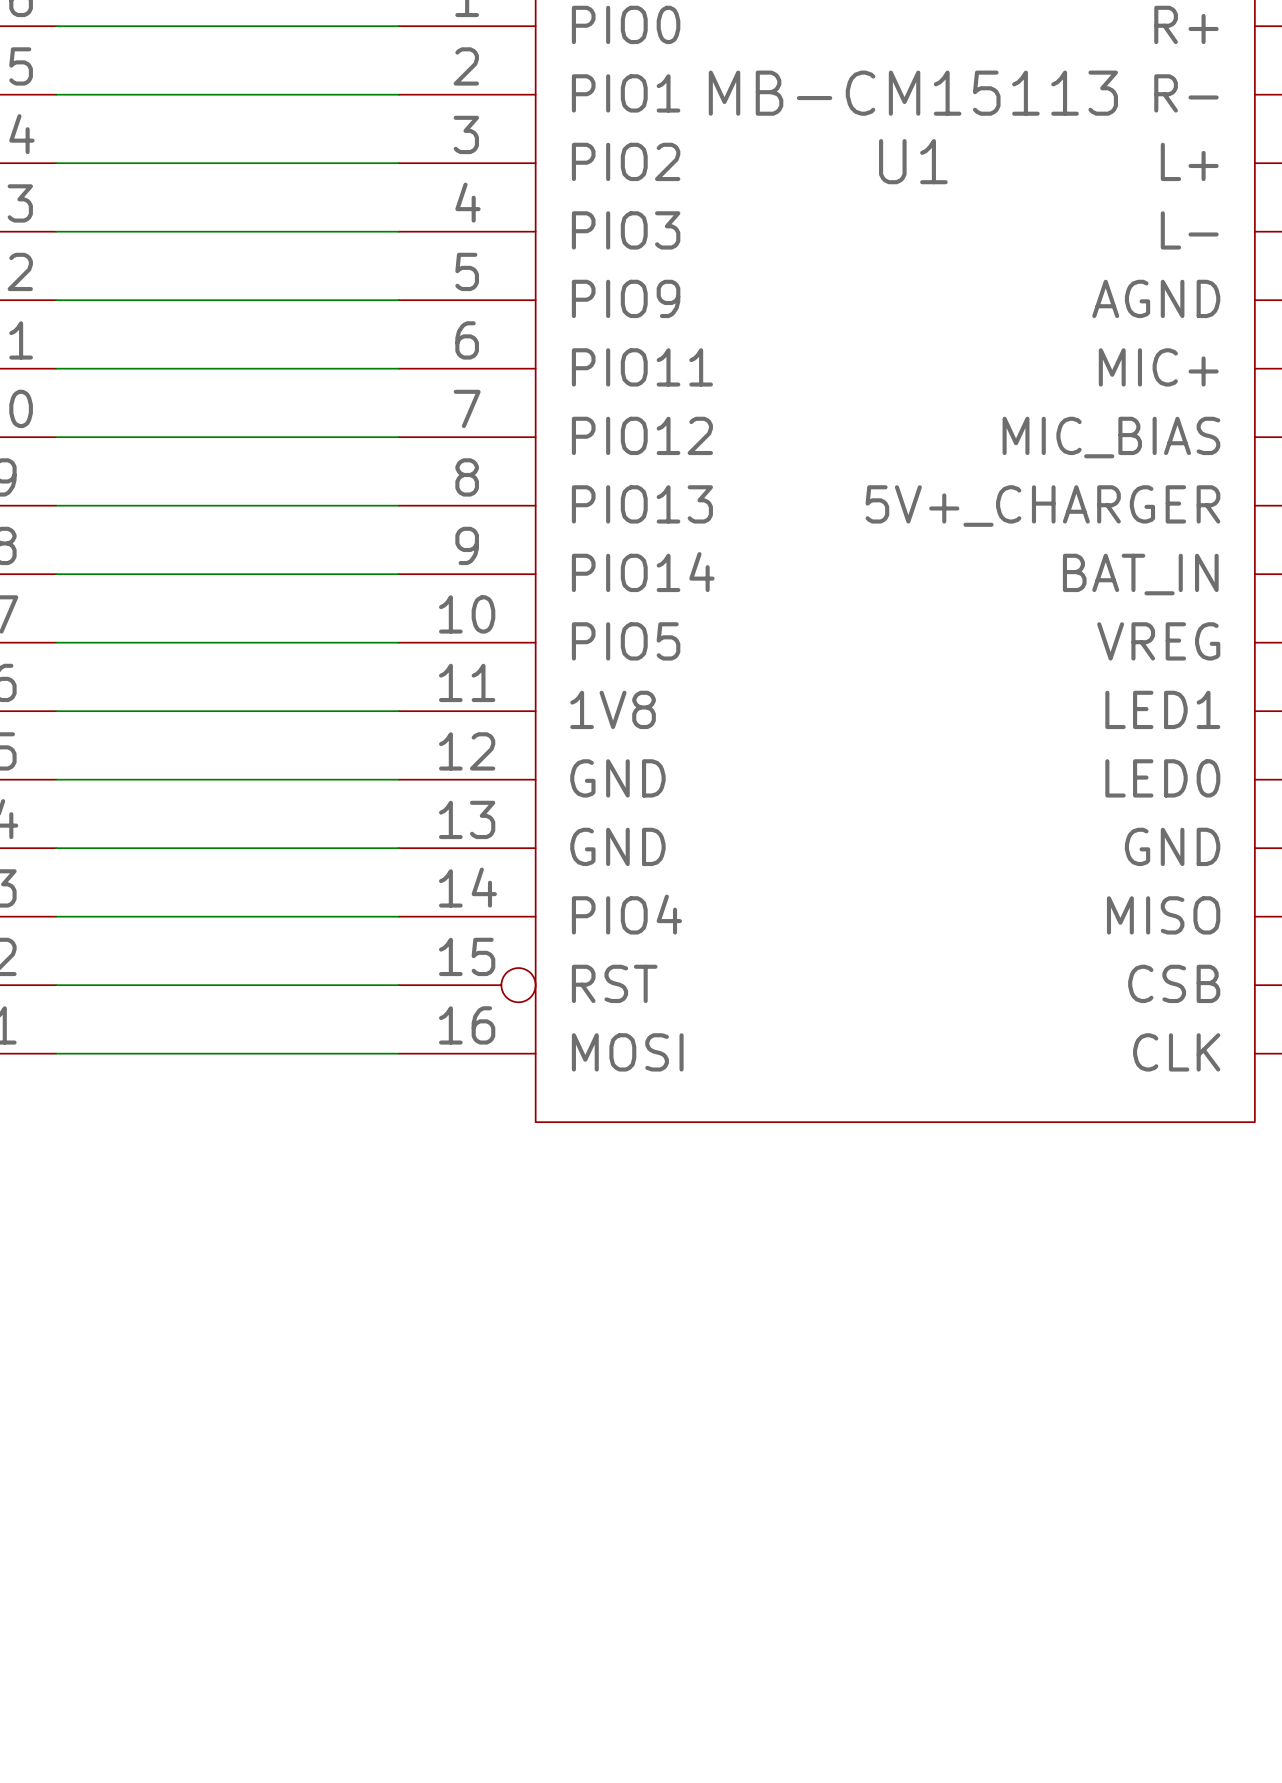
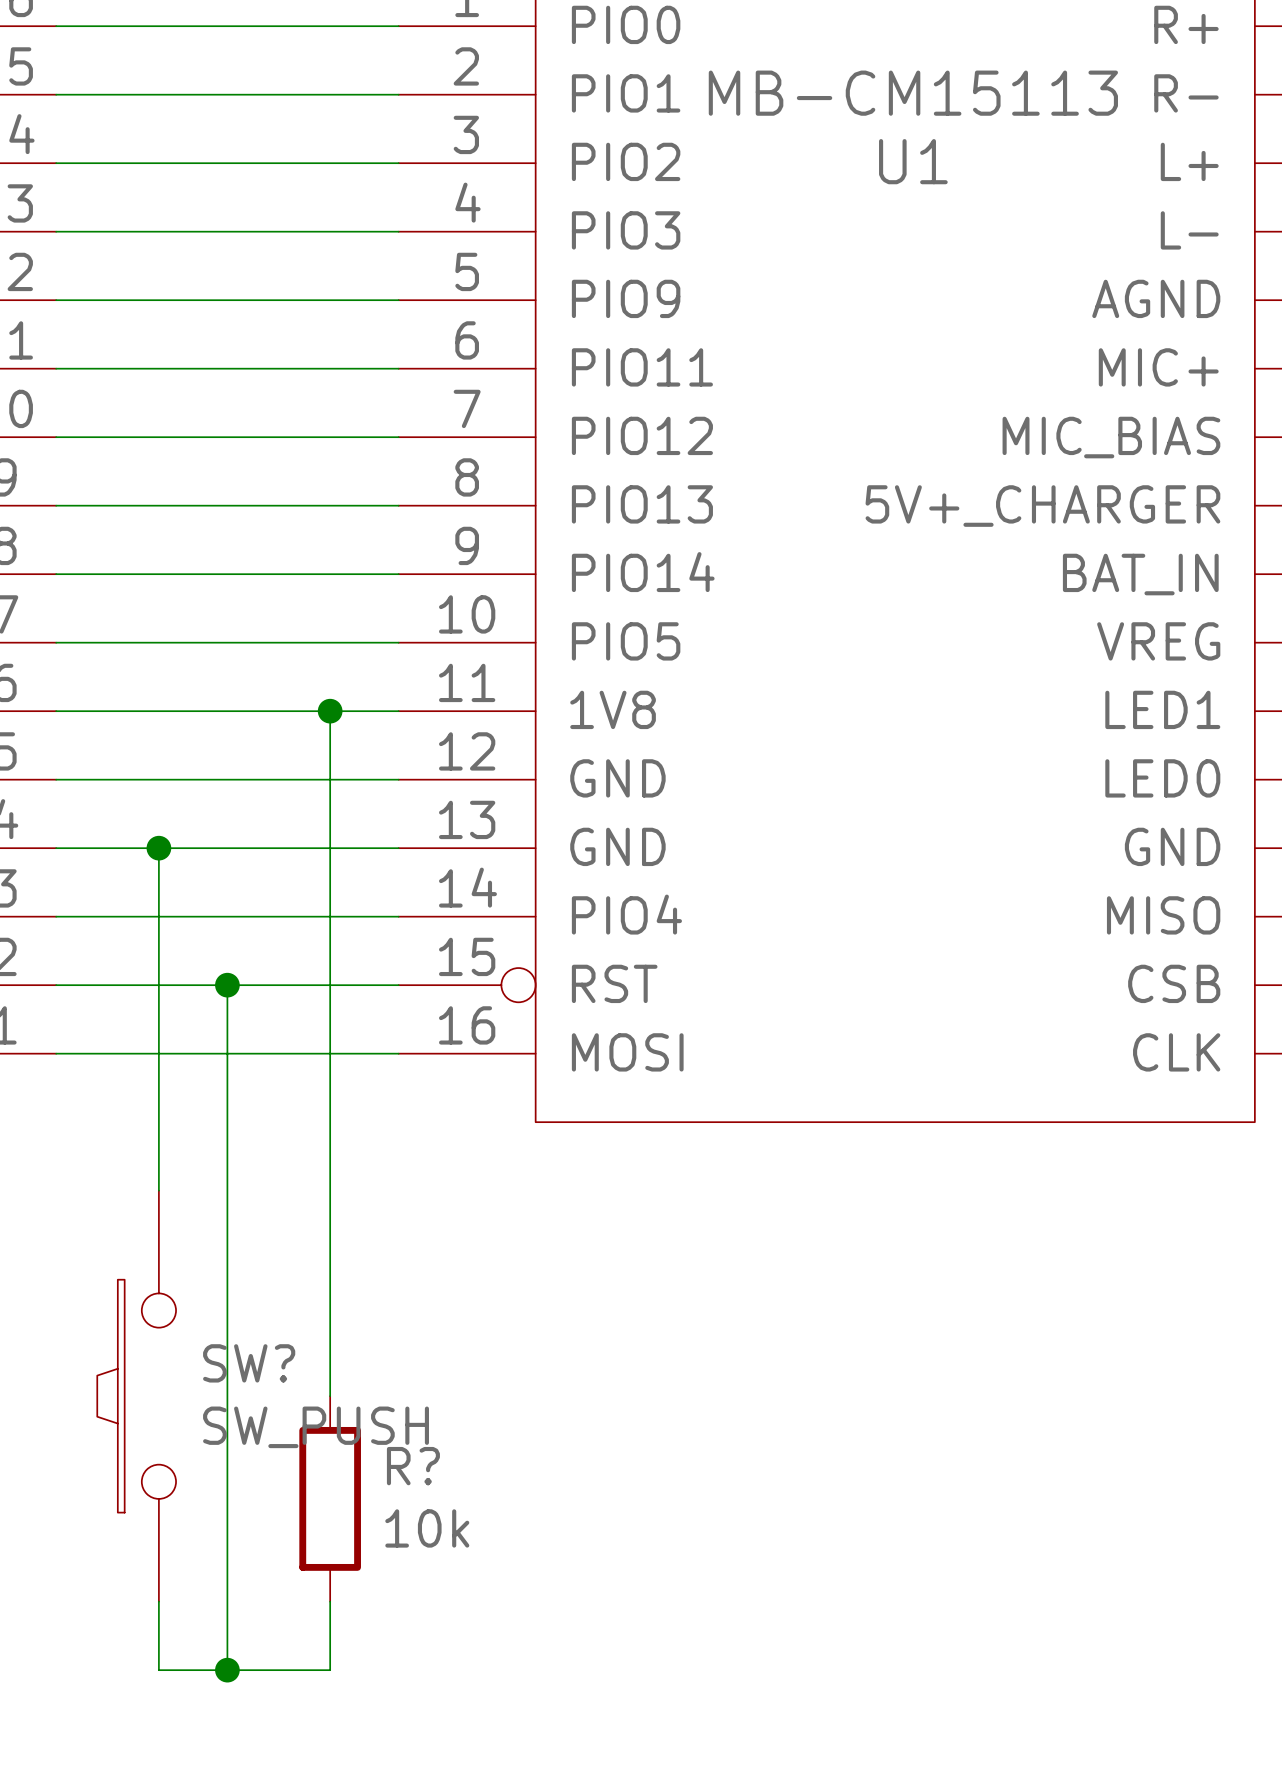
wire: none -> (330, 711) (330, 1396)
junction: none -> (330, 711)
wire: none -> (158, 848) (158, 1190)
junction: none -> (158, 848)
wire: none -> (227, 985) (227, 1670)
junction: none -> (227, 985)
SW?: none -> SW_PUSH (136, 1396)
R?: none -> 10k (330, 1498)
wire: none -> (158, 1601) (158, 1670) (330, 1670) (330, 1601)
junction: none -> (227, 1670)

